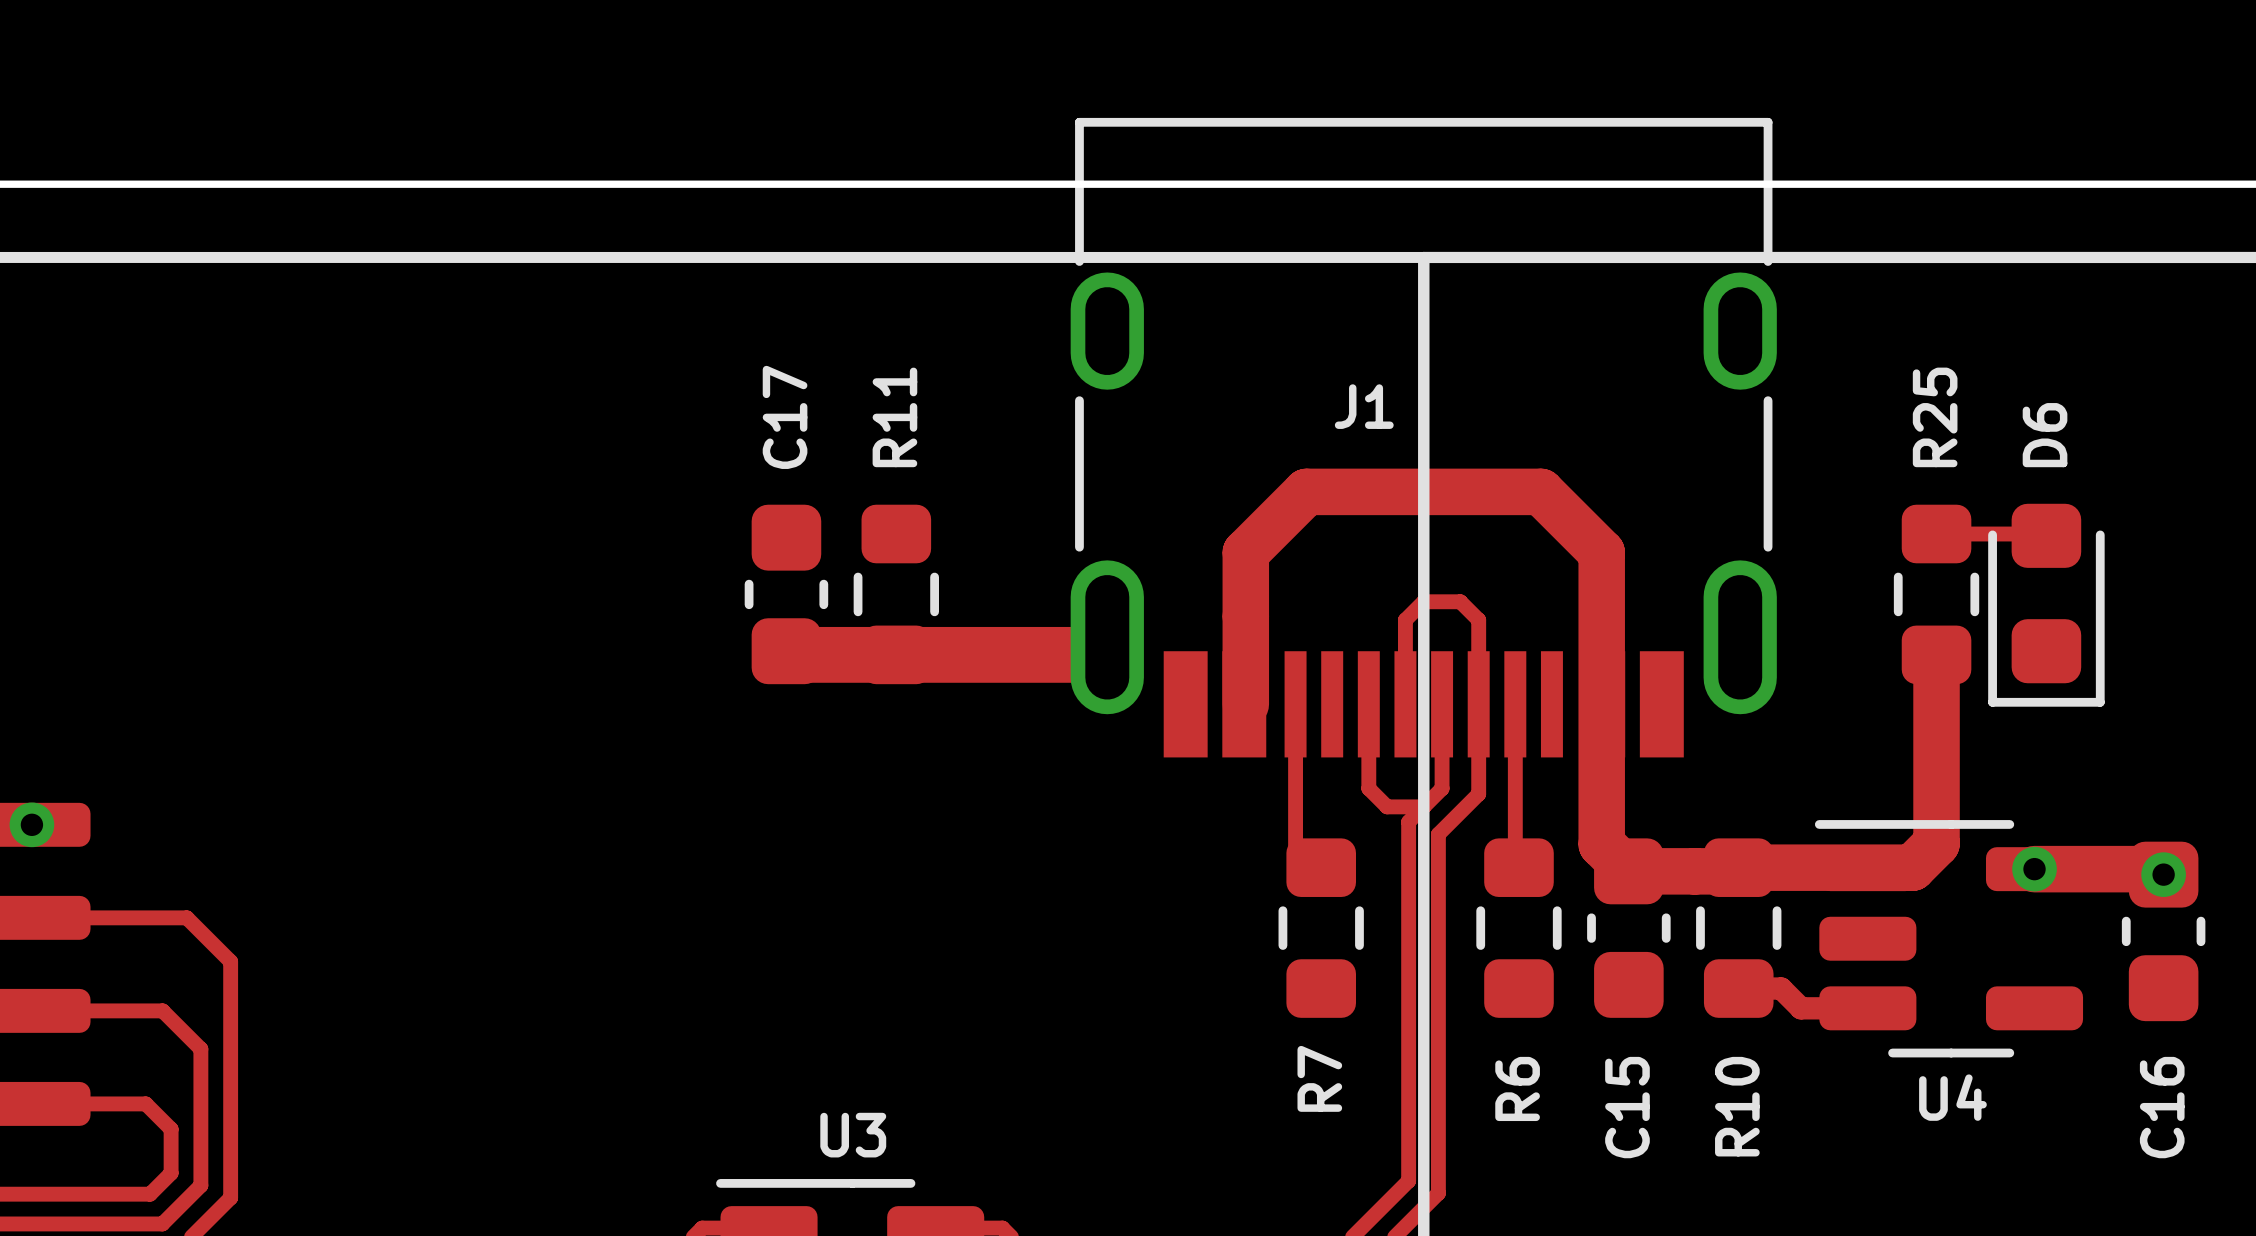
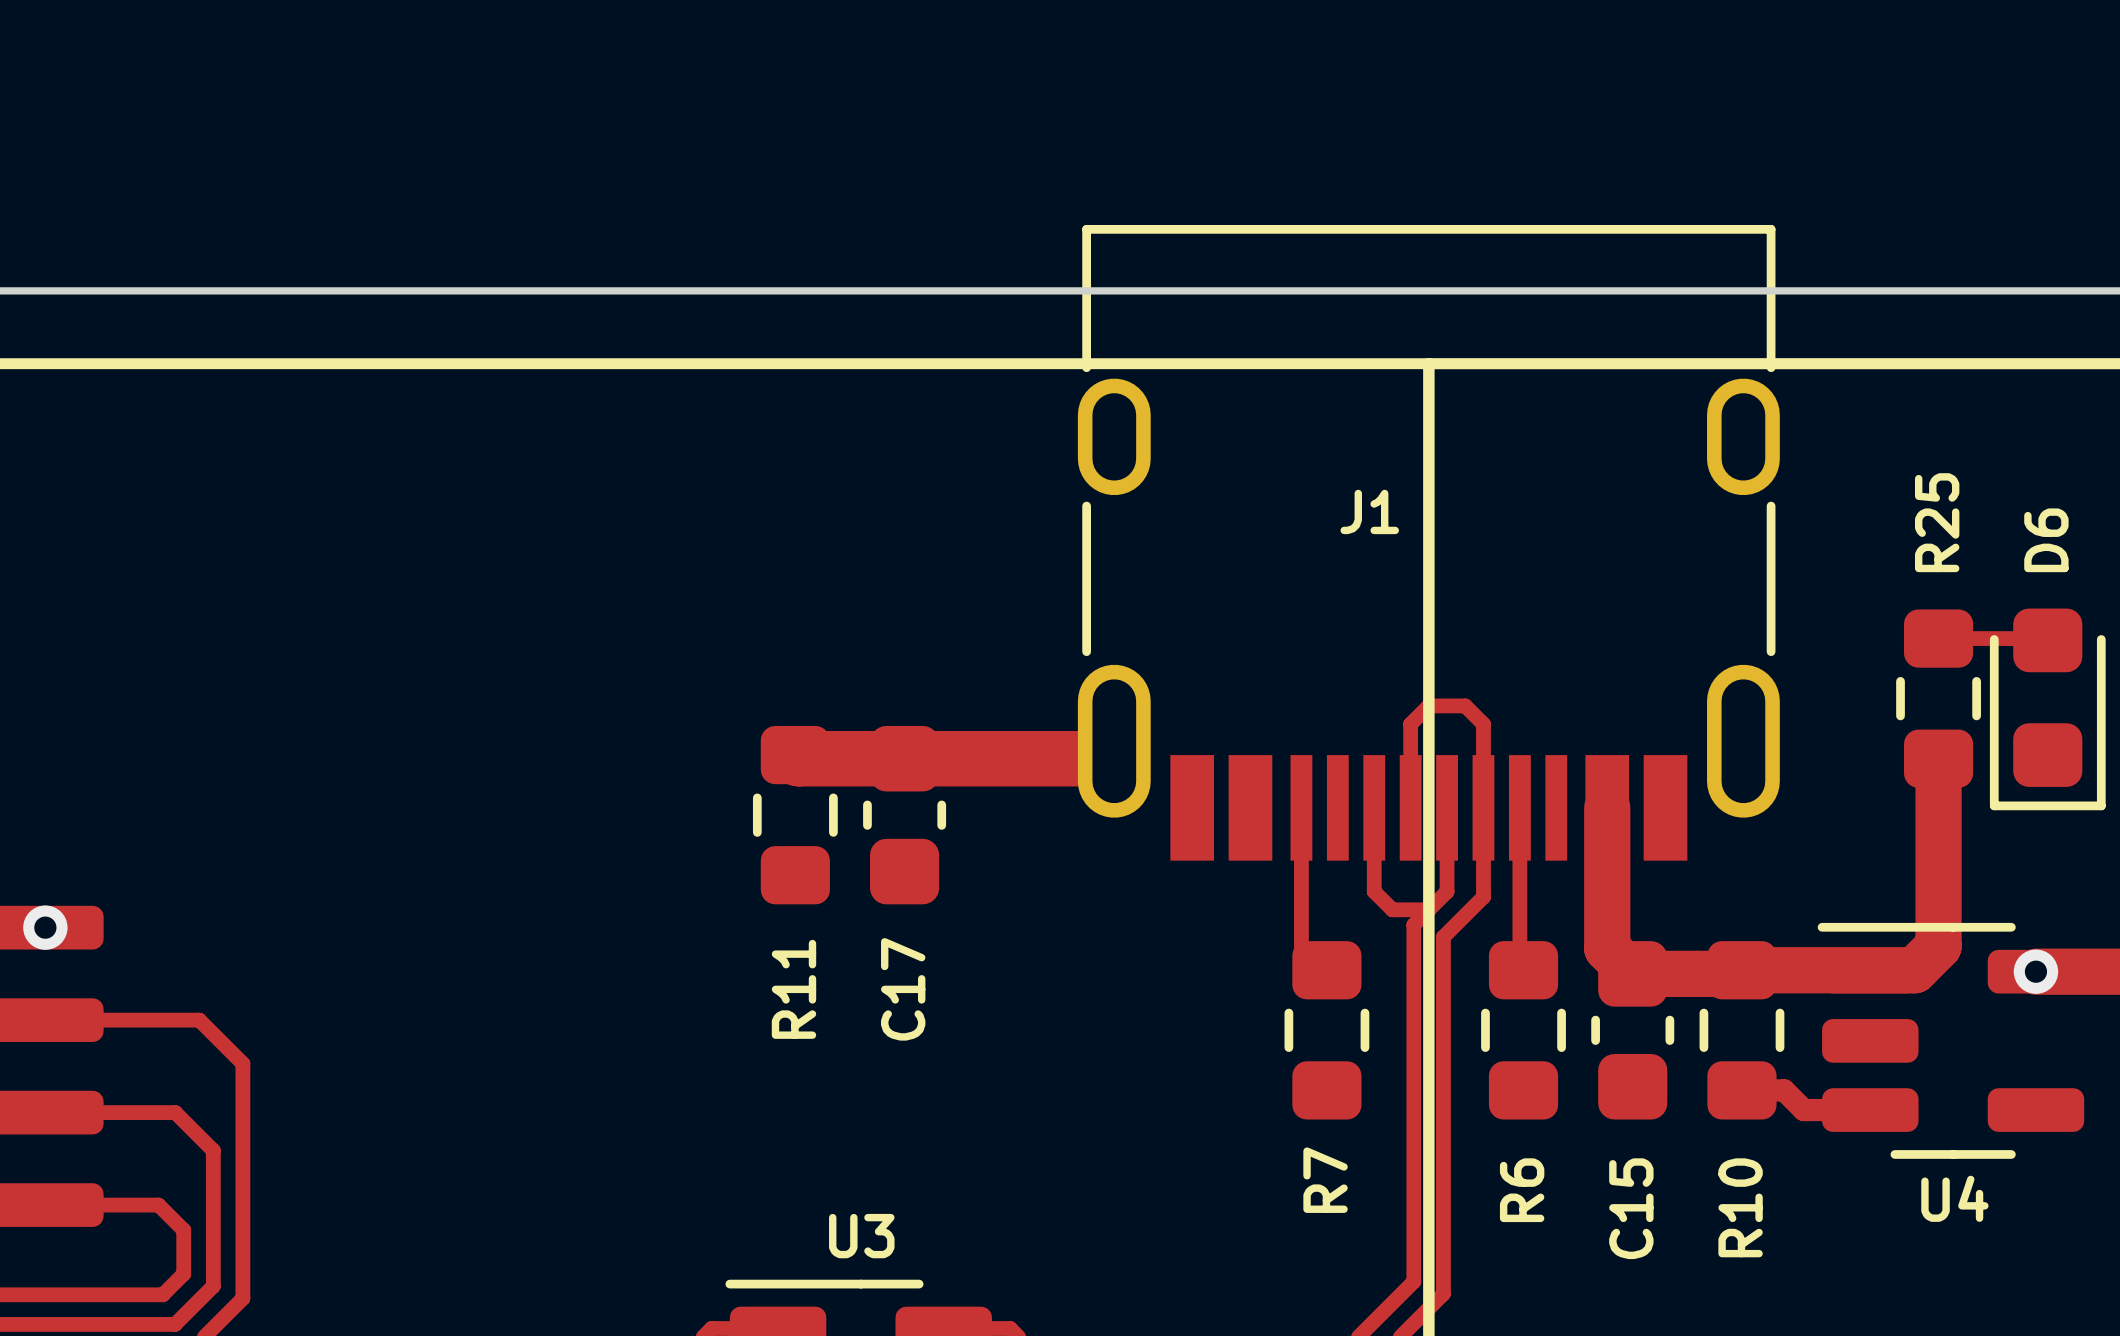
C17 name position: C17 (785, 417) -> C17 (903, 989)
R11 name position: R11 (894, 417) -> R11 (793, 989)
C17 position: (786, 594) -> (904, 815)
R11 position: (896, 594) -> (795, 815)
track: (1245, 704) (1245, 552) (1306, 491) (1540, 491) (1601, 552) (1601, 844) (1603, 845) -> (1607, 807) (1607, 948)

